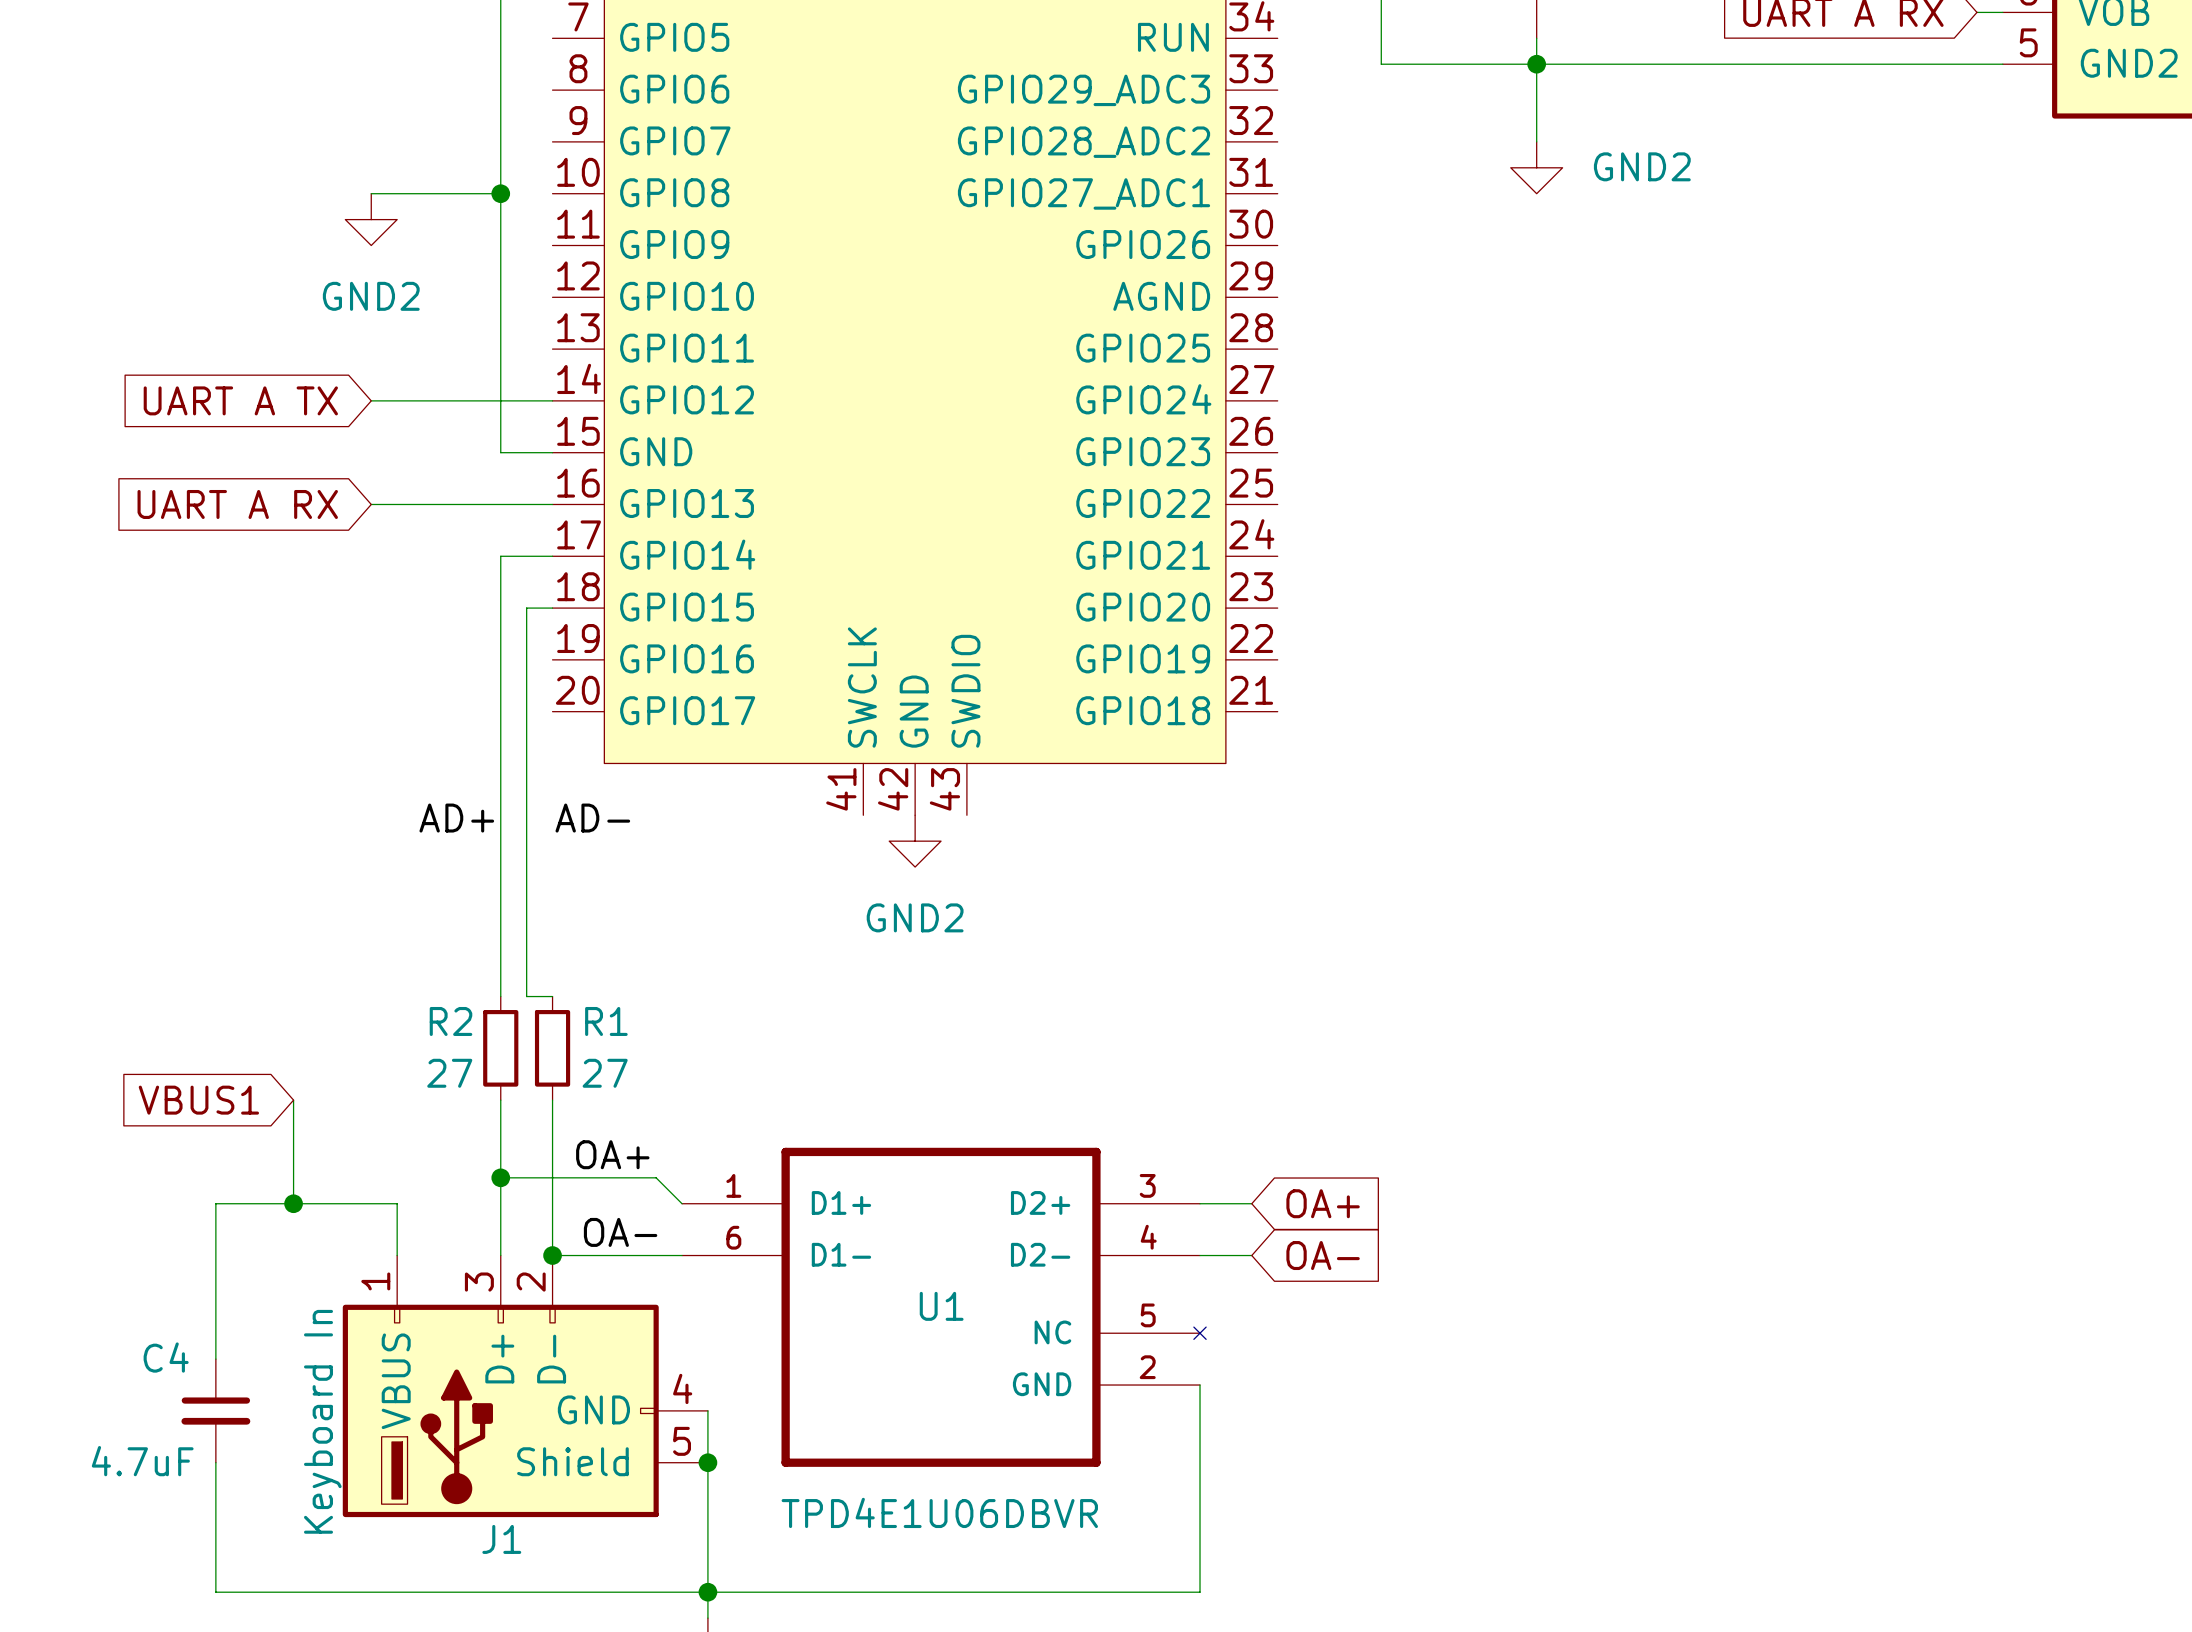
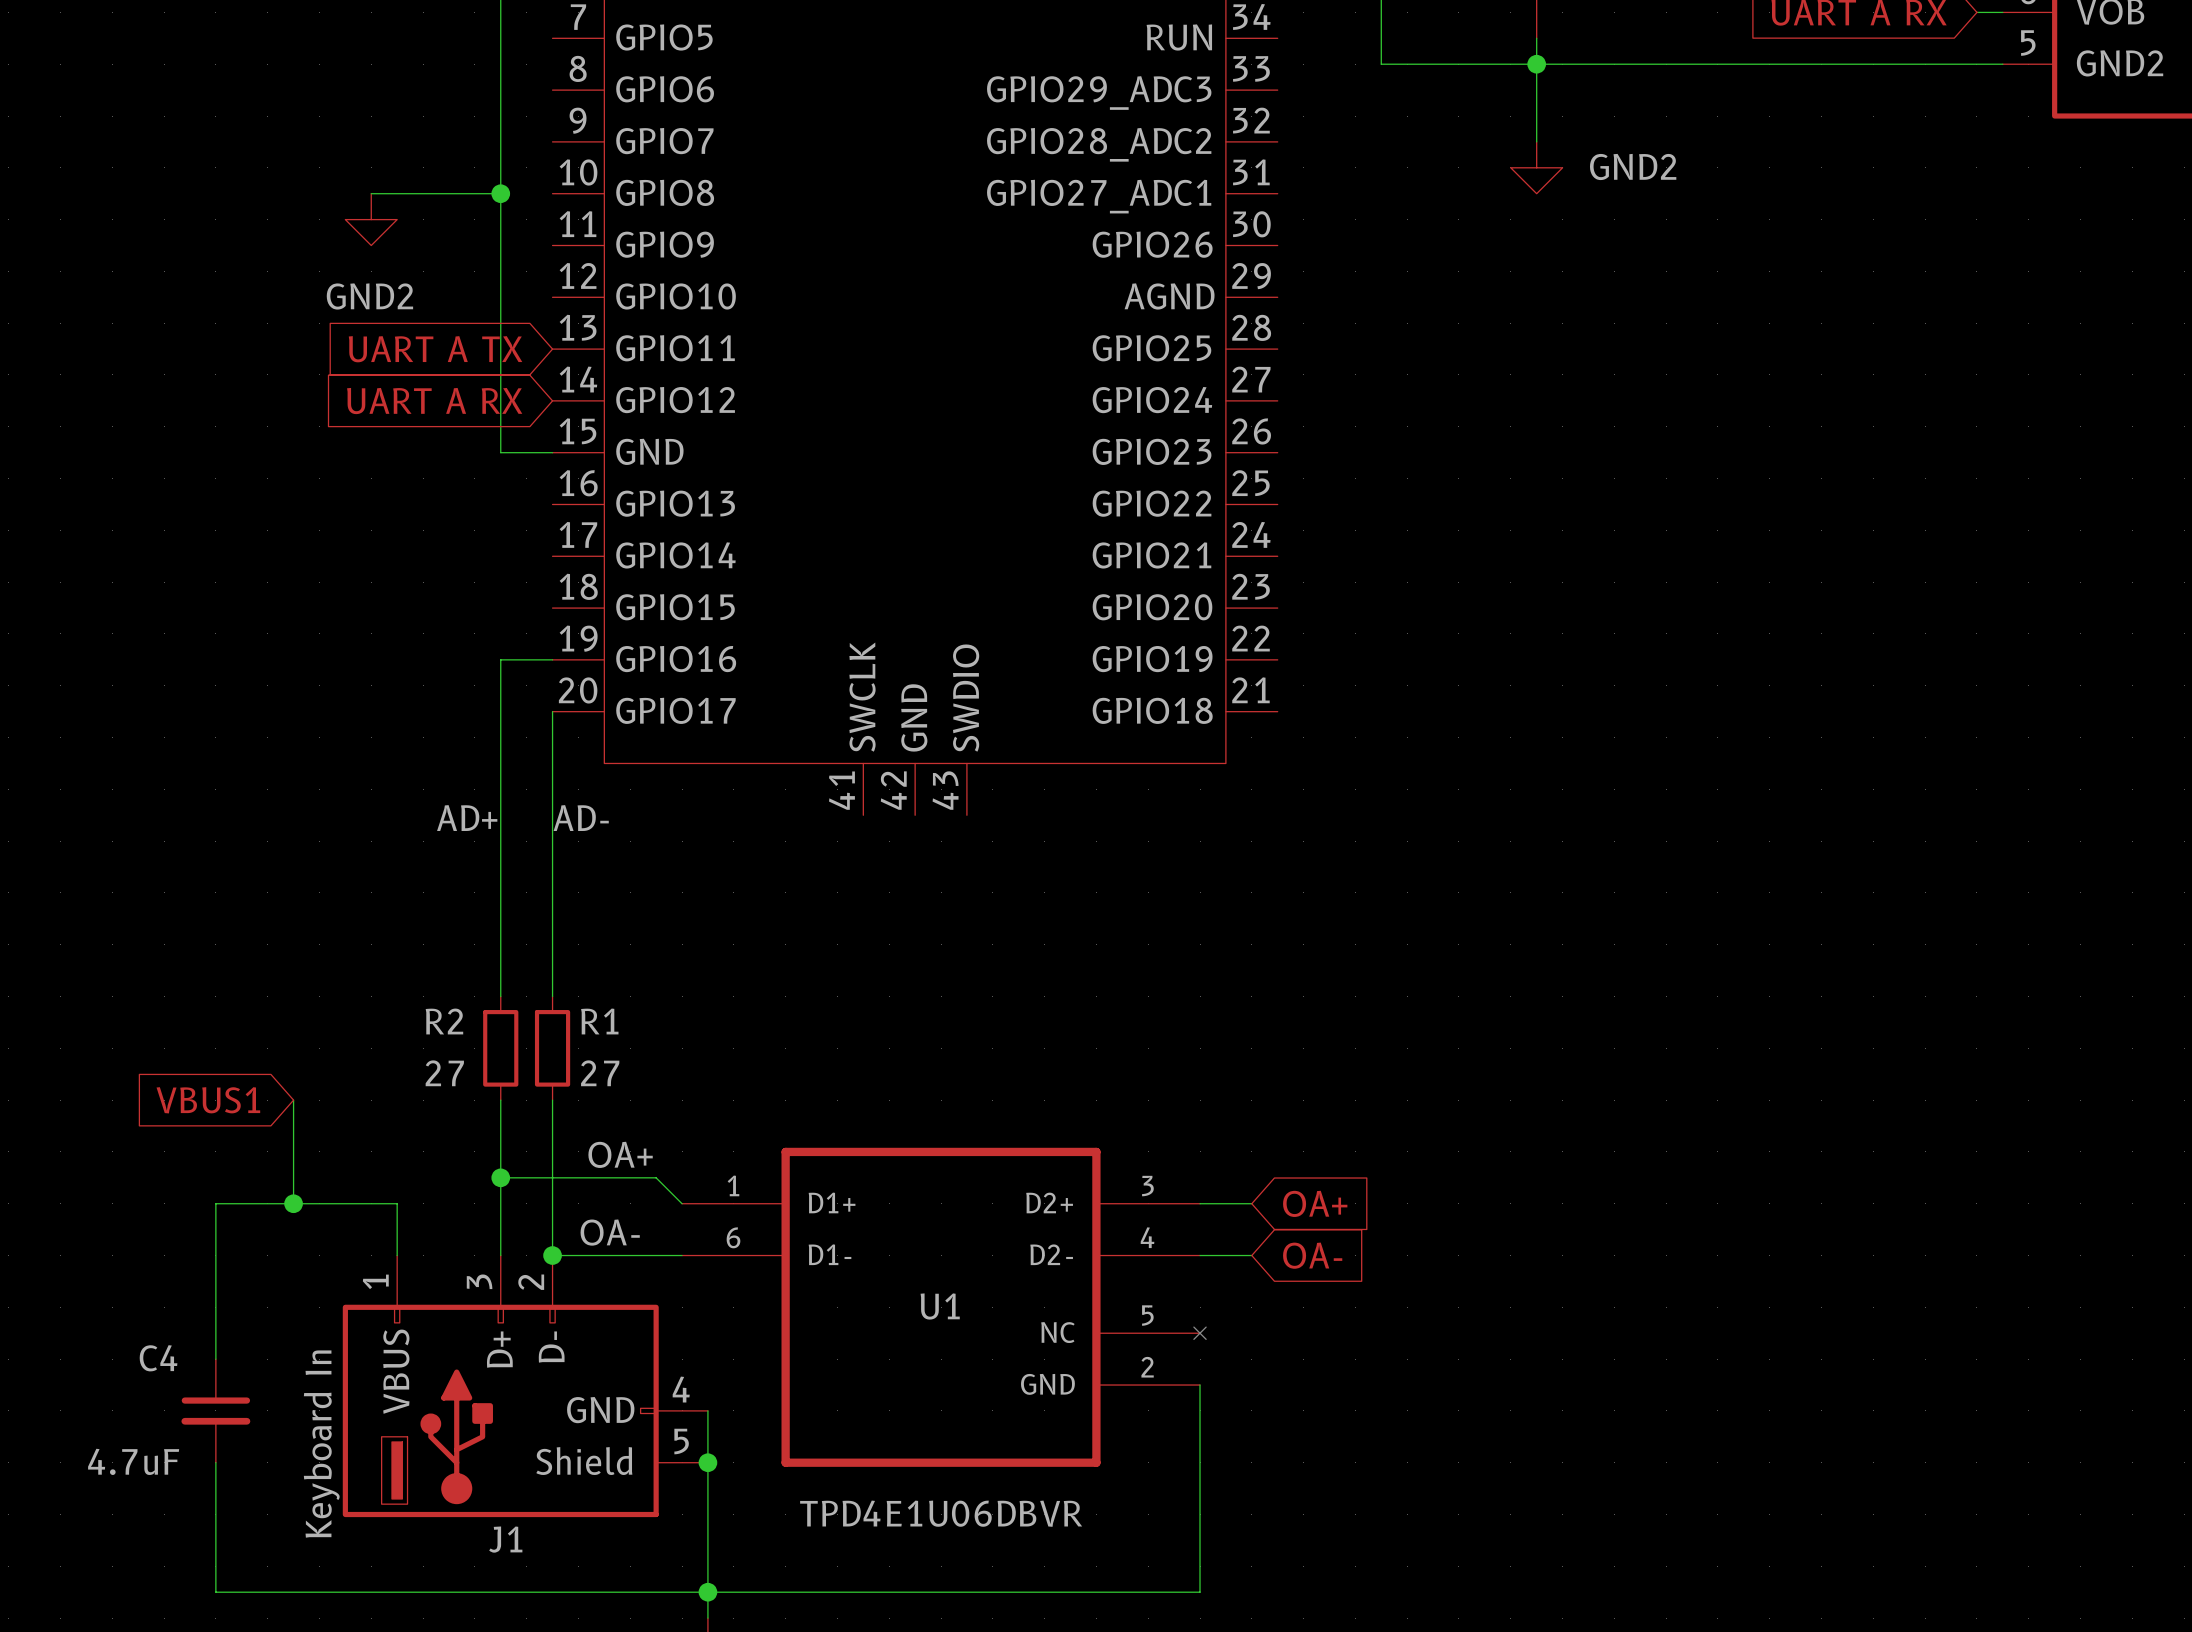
global label position: UART A TX (240, 400) -> UART A TX (435, 349)
wire: (371, 400) (552, 400) -> none
global label position: UART A RX (237, 504) -> UART A RX (434, 401)
wire: (371, 504) (552, 504) -> none
wire: (552, 556) (500, 556) (500, 659) -> (552, 659) (500, 659)
wire: (552, 608) (526, 608) (526, 996) (552, 996) -> (552, 711) (552, 996)
power symbol: GND2 (915, 841) -> none

